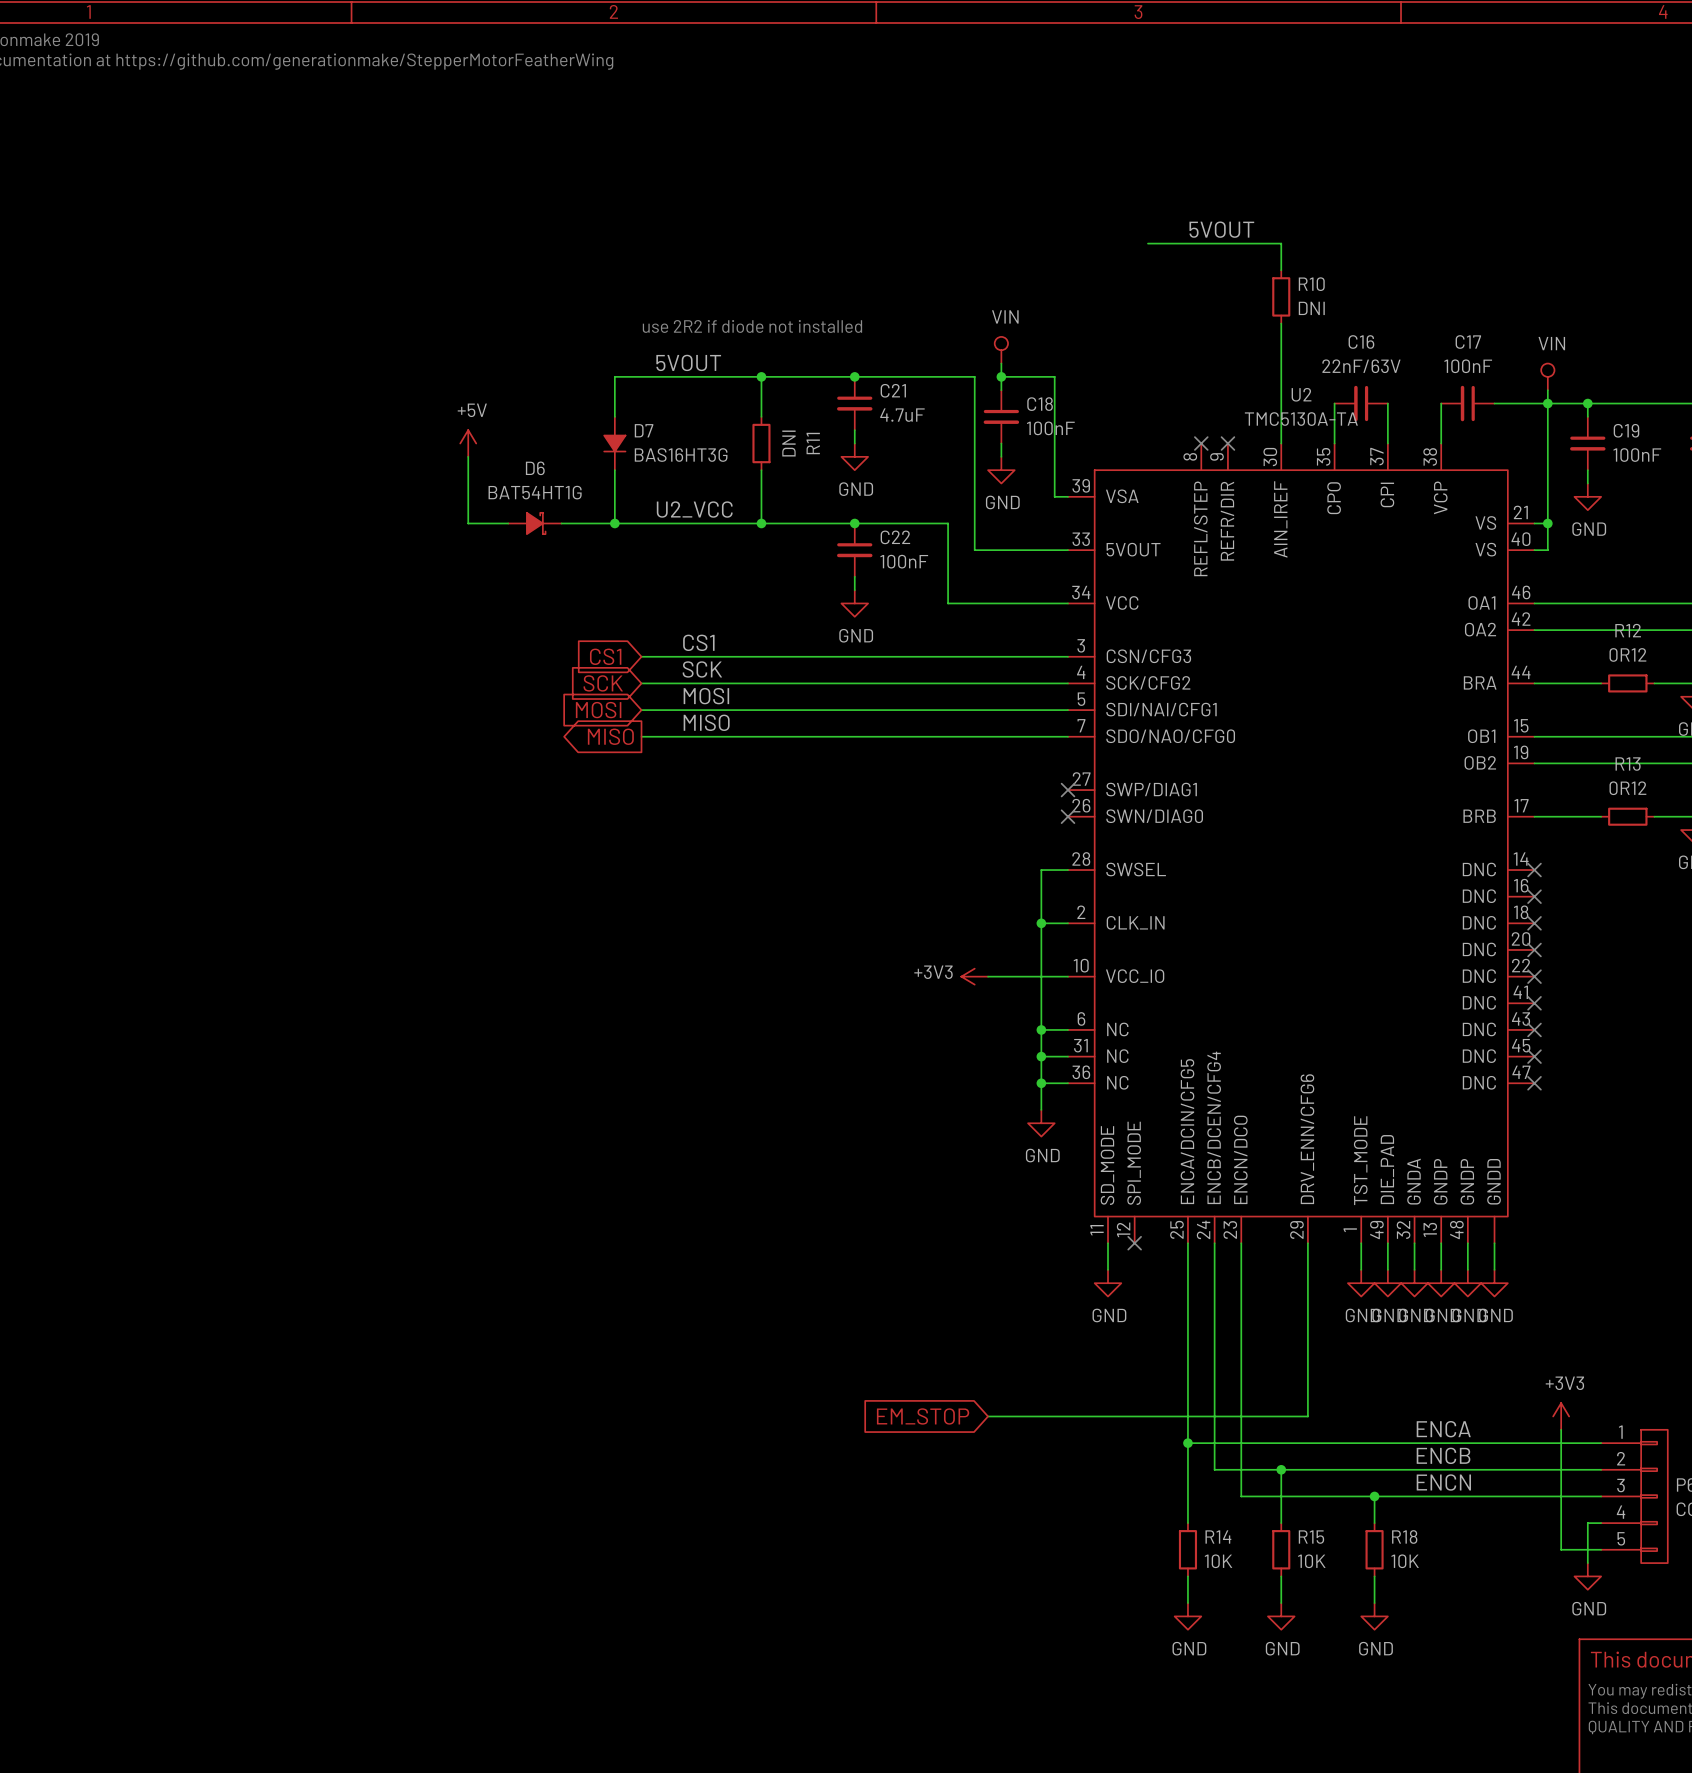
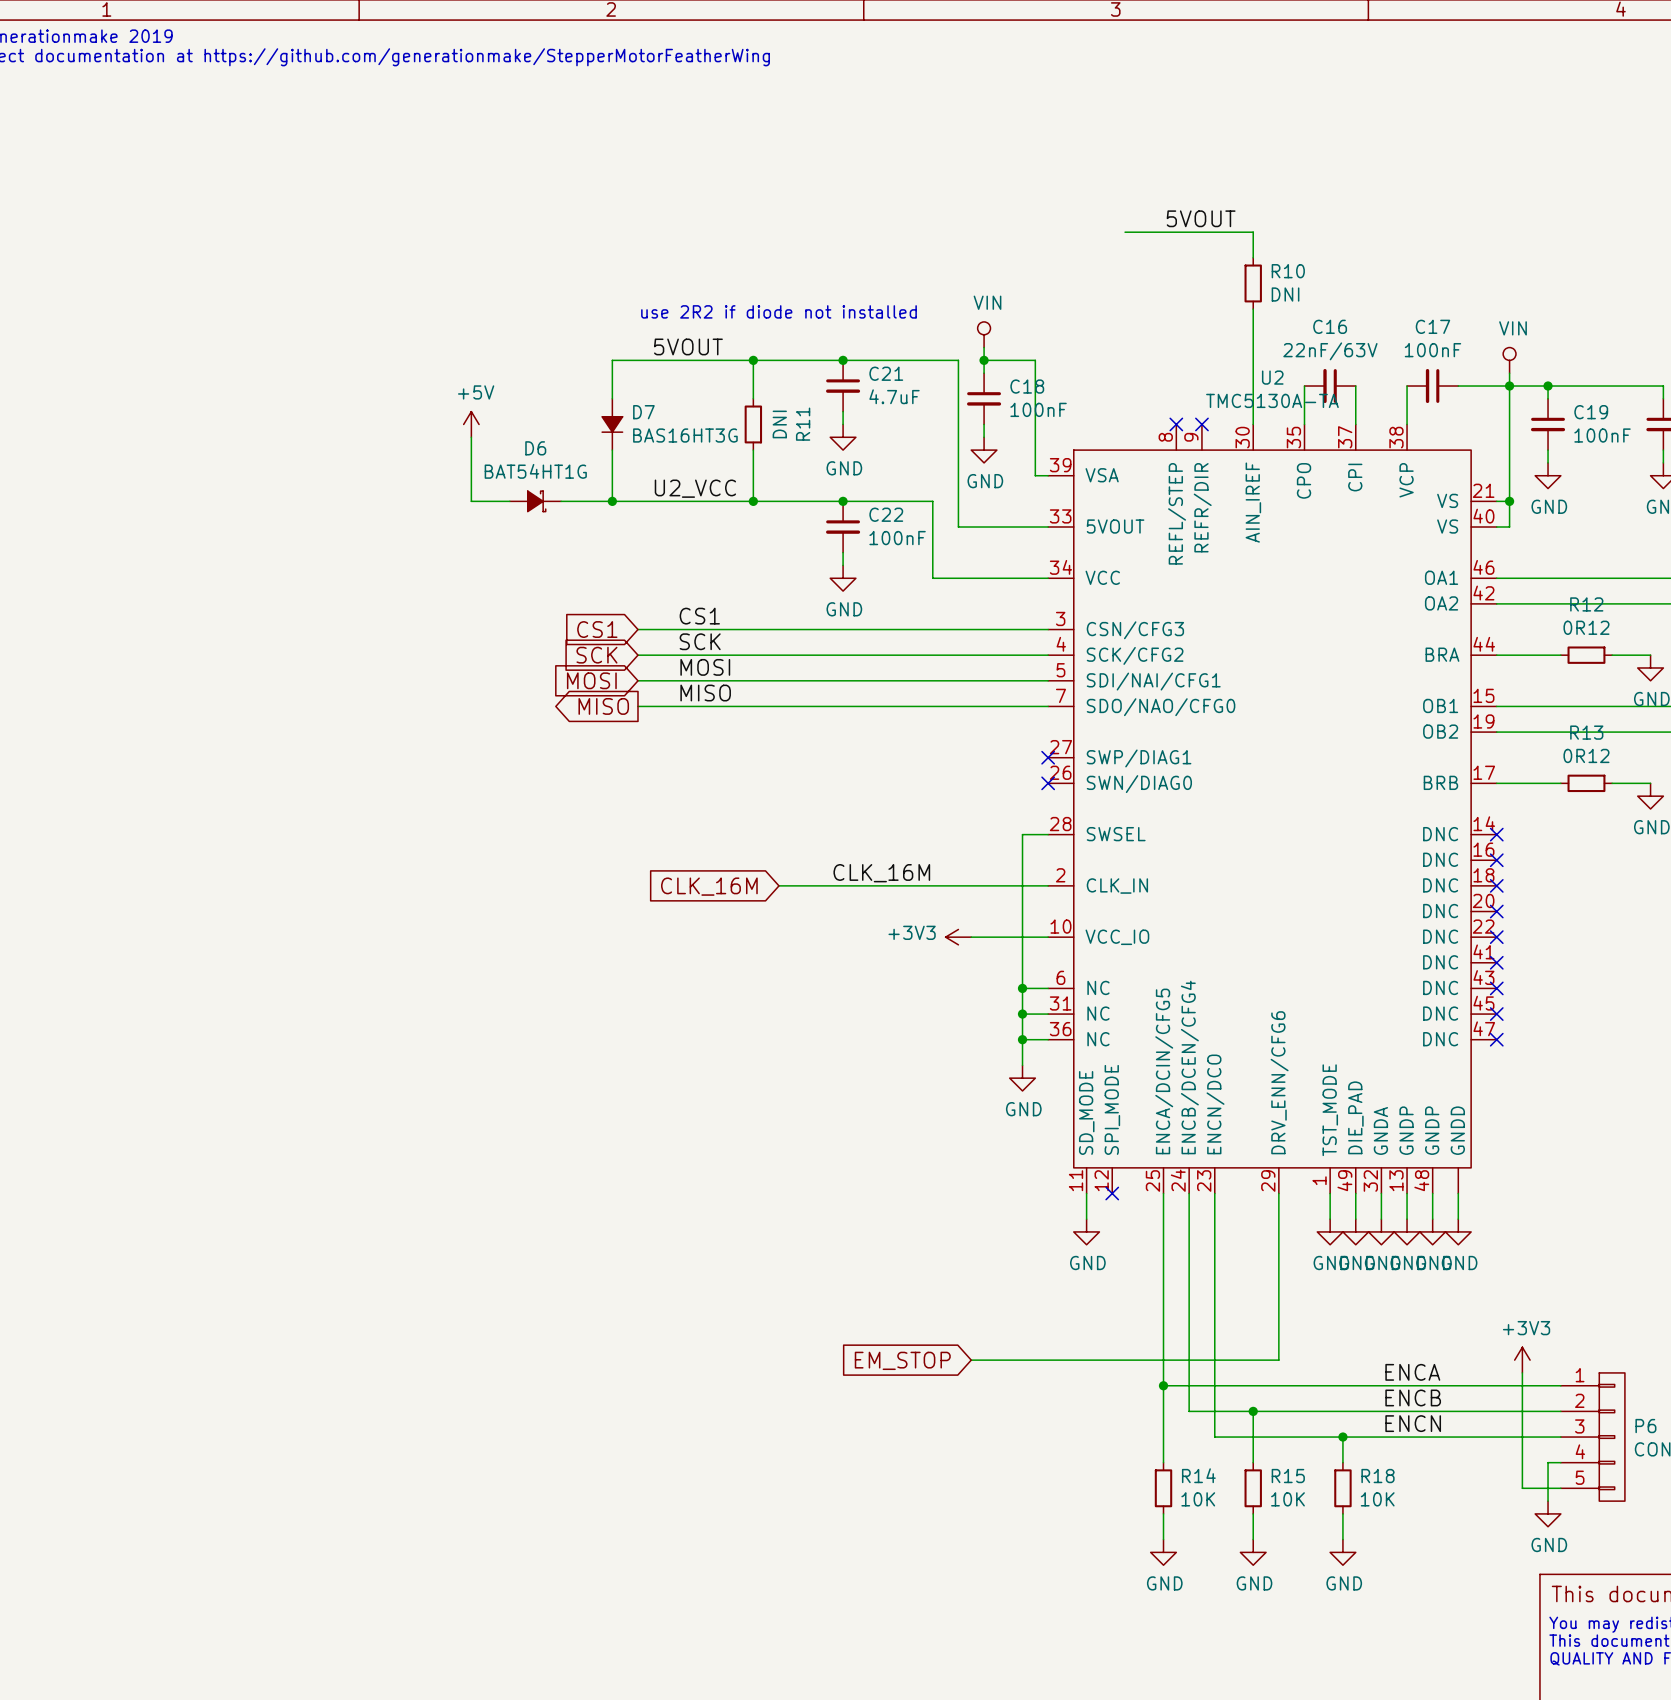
label: none -> CLK_16M (881, 873)
global label: none -> CLK_16M (709, 886)
wire: none -> (778, 885) (1022, 885)
junction: (1041, 923) -> none

